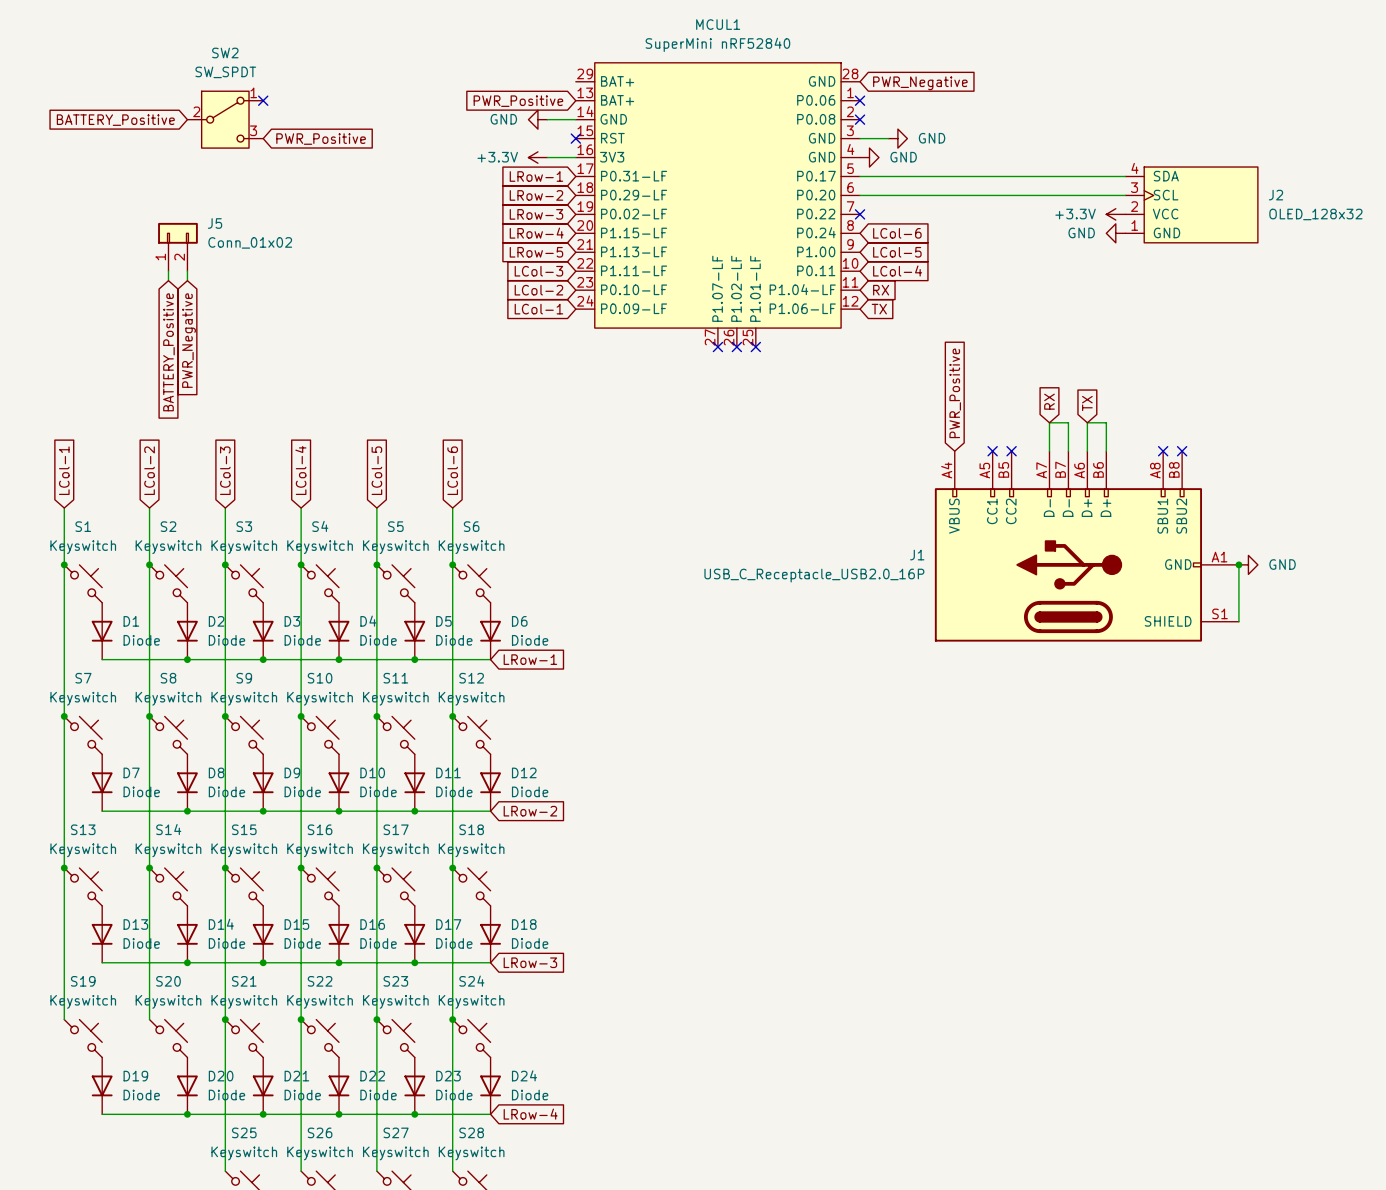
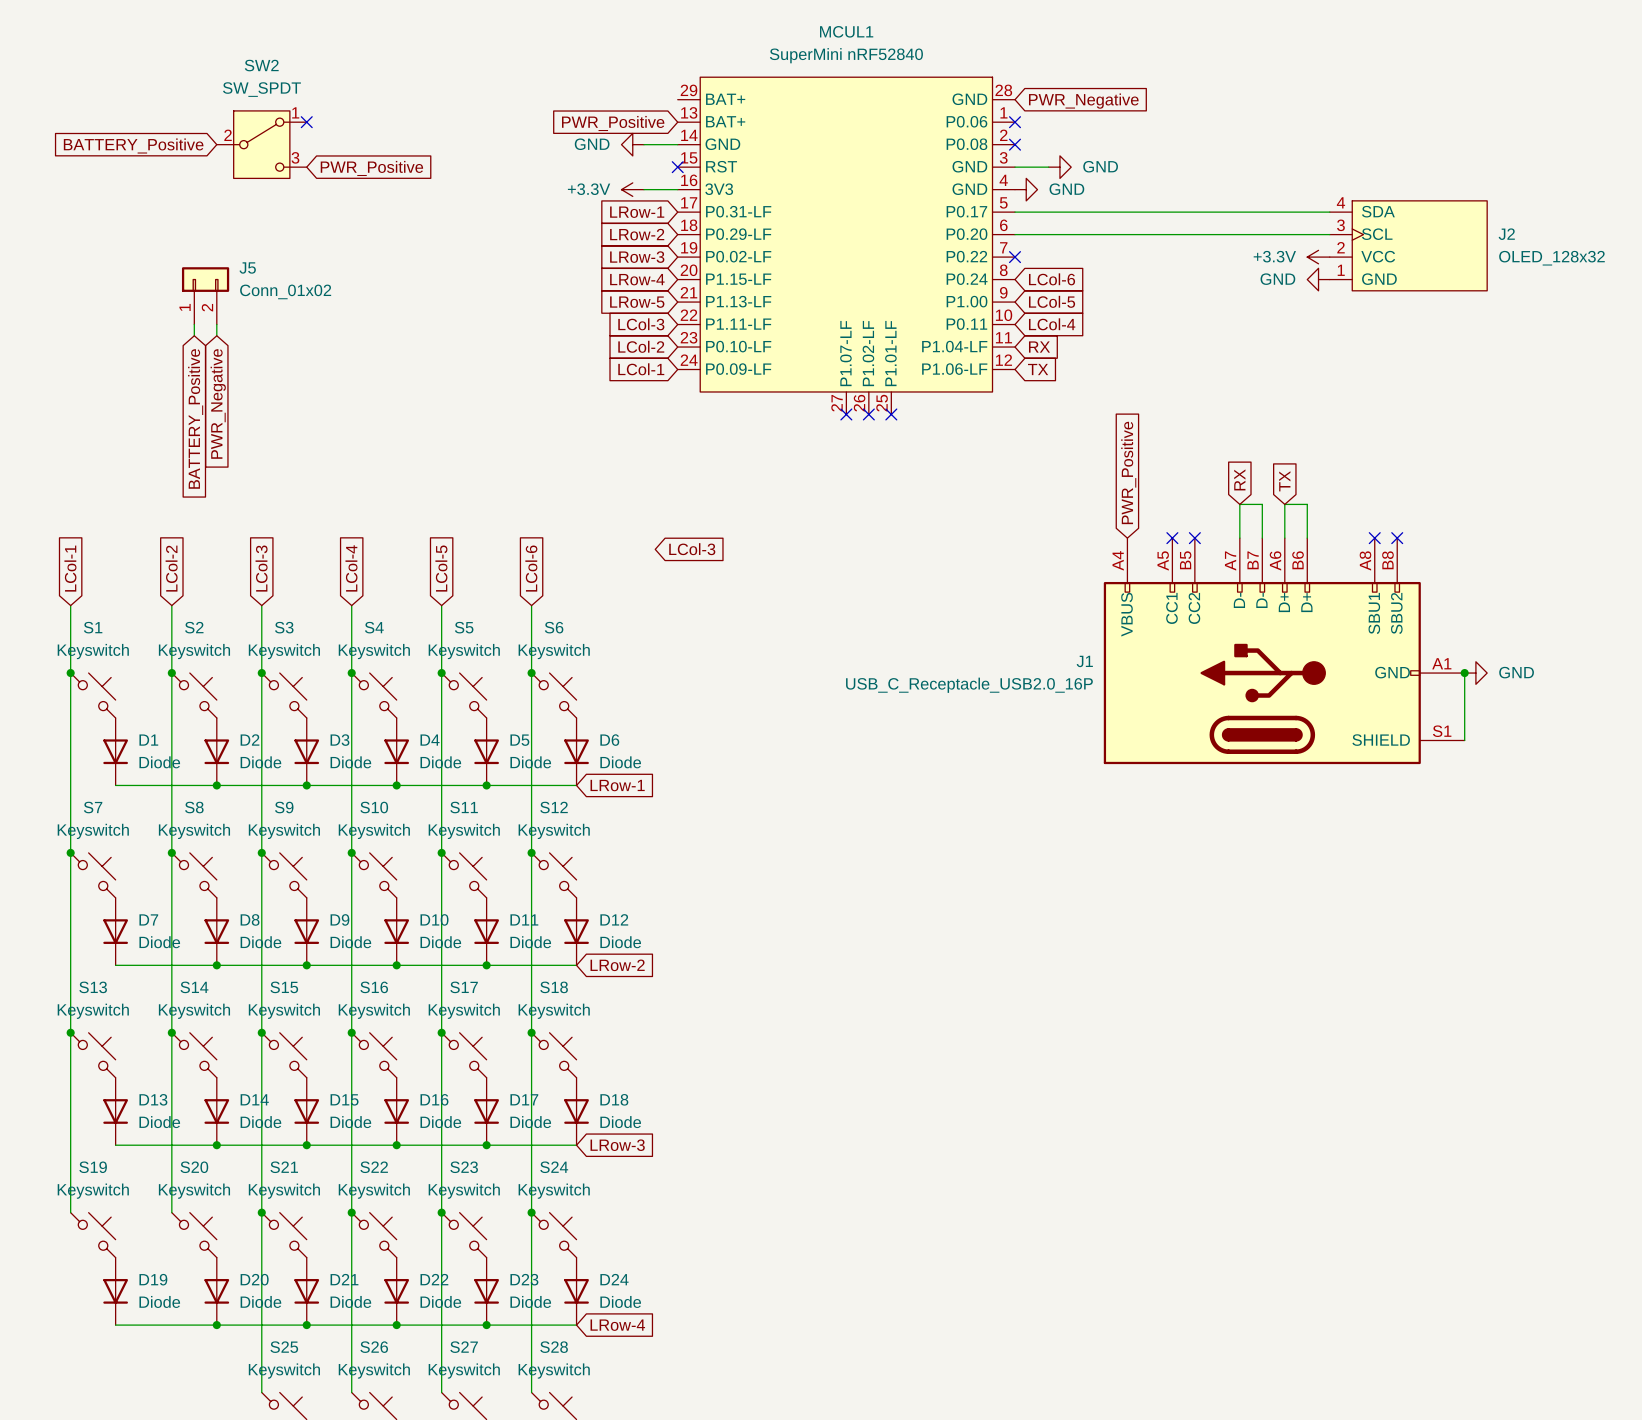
global label: none -> LCol-3 (692, 549)

